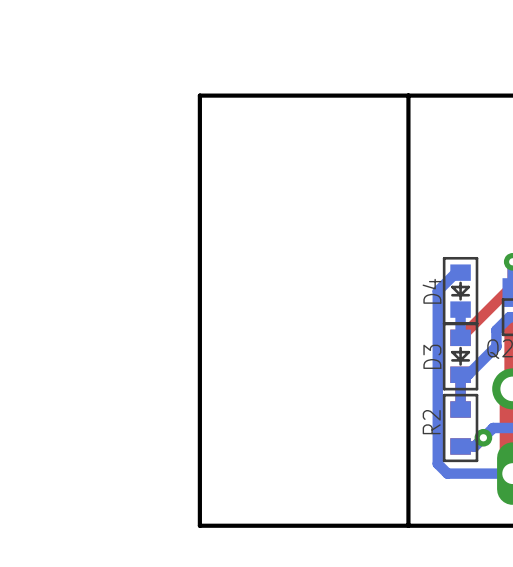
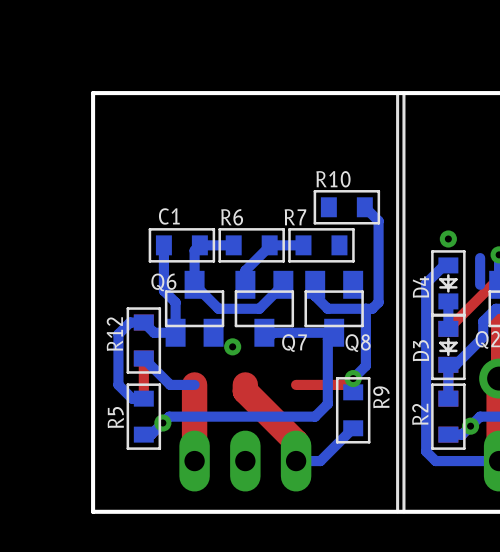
board edge: (199, 95) (199, 525) -> (194, 93) (93, 93) (93, 511) (194, 511)
board edge: (408, 95) (408, 525) -> none
line: none -> (397, 93) (397, 511)
line: none -> (403, 93) (403, 511)
R10: none -> (346, 207)
bottom track: none -> (364, 207) (378, 221) (378, 302) (372, 308) (327, 308) (315, 296) (315, 284)
via: none -> (448, 239)
bottom track: none -> (163, 245) (163, 290) (175, 302) (175, 332) (154, 332) (143, 322) (130, 322) (118, 334) (118, 384) (132, 398) (143, 398)
C1: none -> (181, 245)
bottom track: none -> (233, 245) (199, 245) (194, 250) (194, 284) (218, 308) (259, 308) (283, 284)
R6: none -> (251, 245)
bottom track: none -> (303, 245) (269, 245) (245, 270) (245, 284)
R7: none -> (321, 245)
bottom track: none -> (480, 258) (480, 284)
Q6: none -> (194, 308)
Q7: none -> (264, 308)
Q8: none -> (334, 308)
bottom track: none -> (365, 308) (365, 365) (353, 378) (353, 392)
bottom track: none -> (264, 332) (268, 337) (273, 332) (334, 332) (327, 339) (327, 403) (315, 416) (169, 416) (151, 434) (143, 434)
R12: none -> (143, 340)
via: none -> (232, 346)
top track: none -> (143, 358) (143, 398)
bottom track: none -> (143, 358) (170, 384) (194, 384)
top track: none -> (353, 378) (346, 384) (296, 384)
via: none -> (353, 378)
top track: none -> (194, 384) (194, 461)
top track: none -> (245, 384) (245, 391) (296, 442) (296, 461)
R9: none -> (353, 410)
R5: none -> (143, 416)
via: none -> (162, 422)
bottom track: none -> (353, 428) (320, 461) (296, 461)
part: none -> (245, 461)

